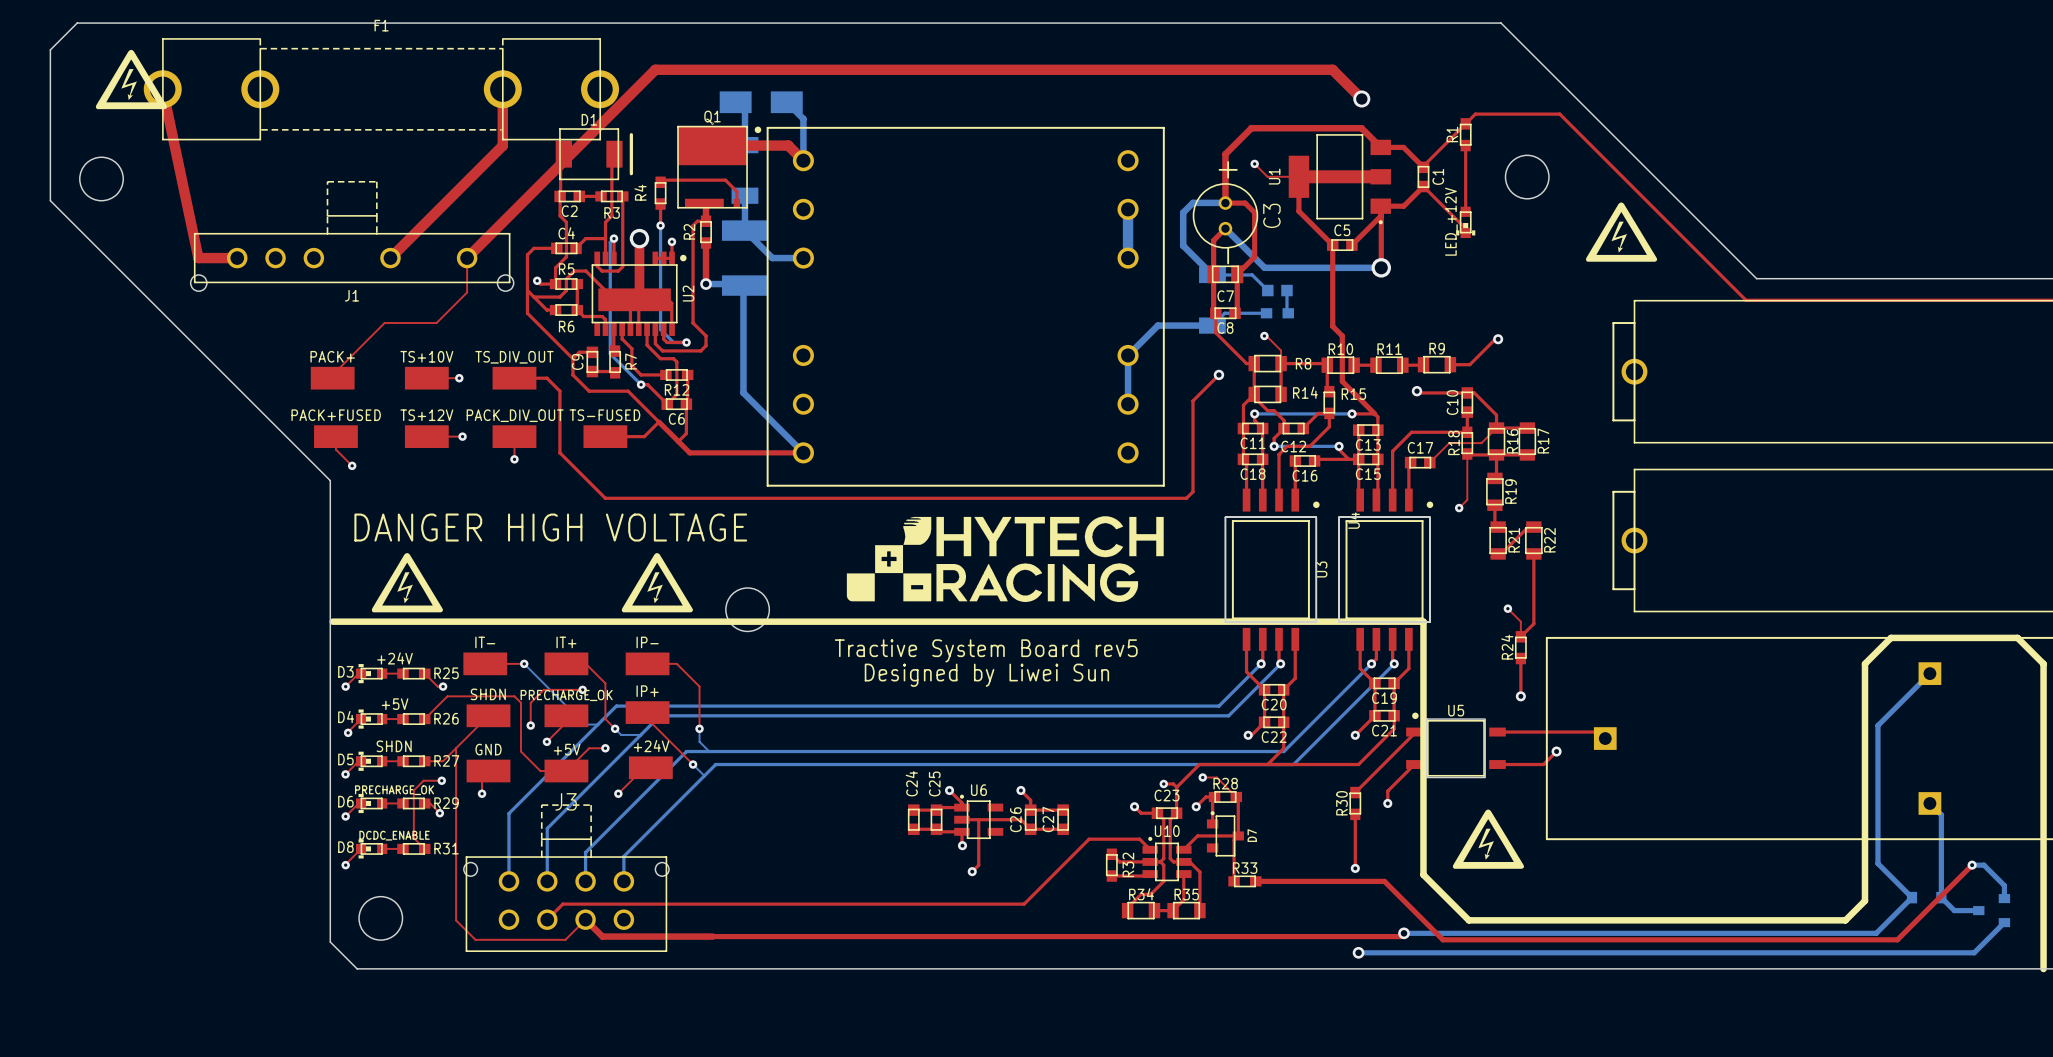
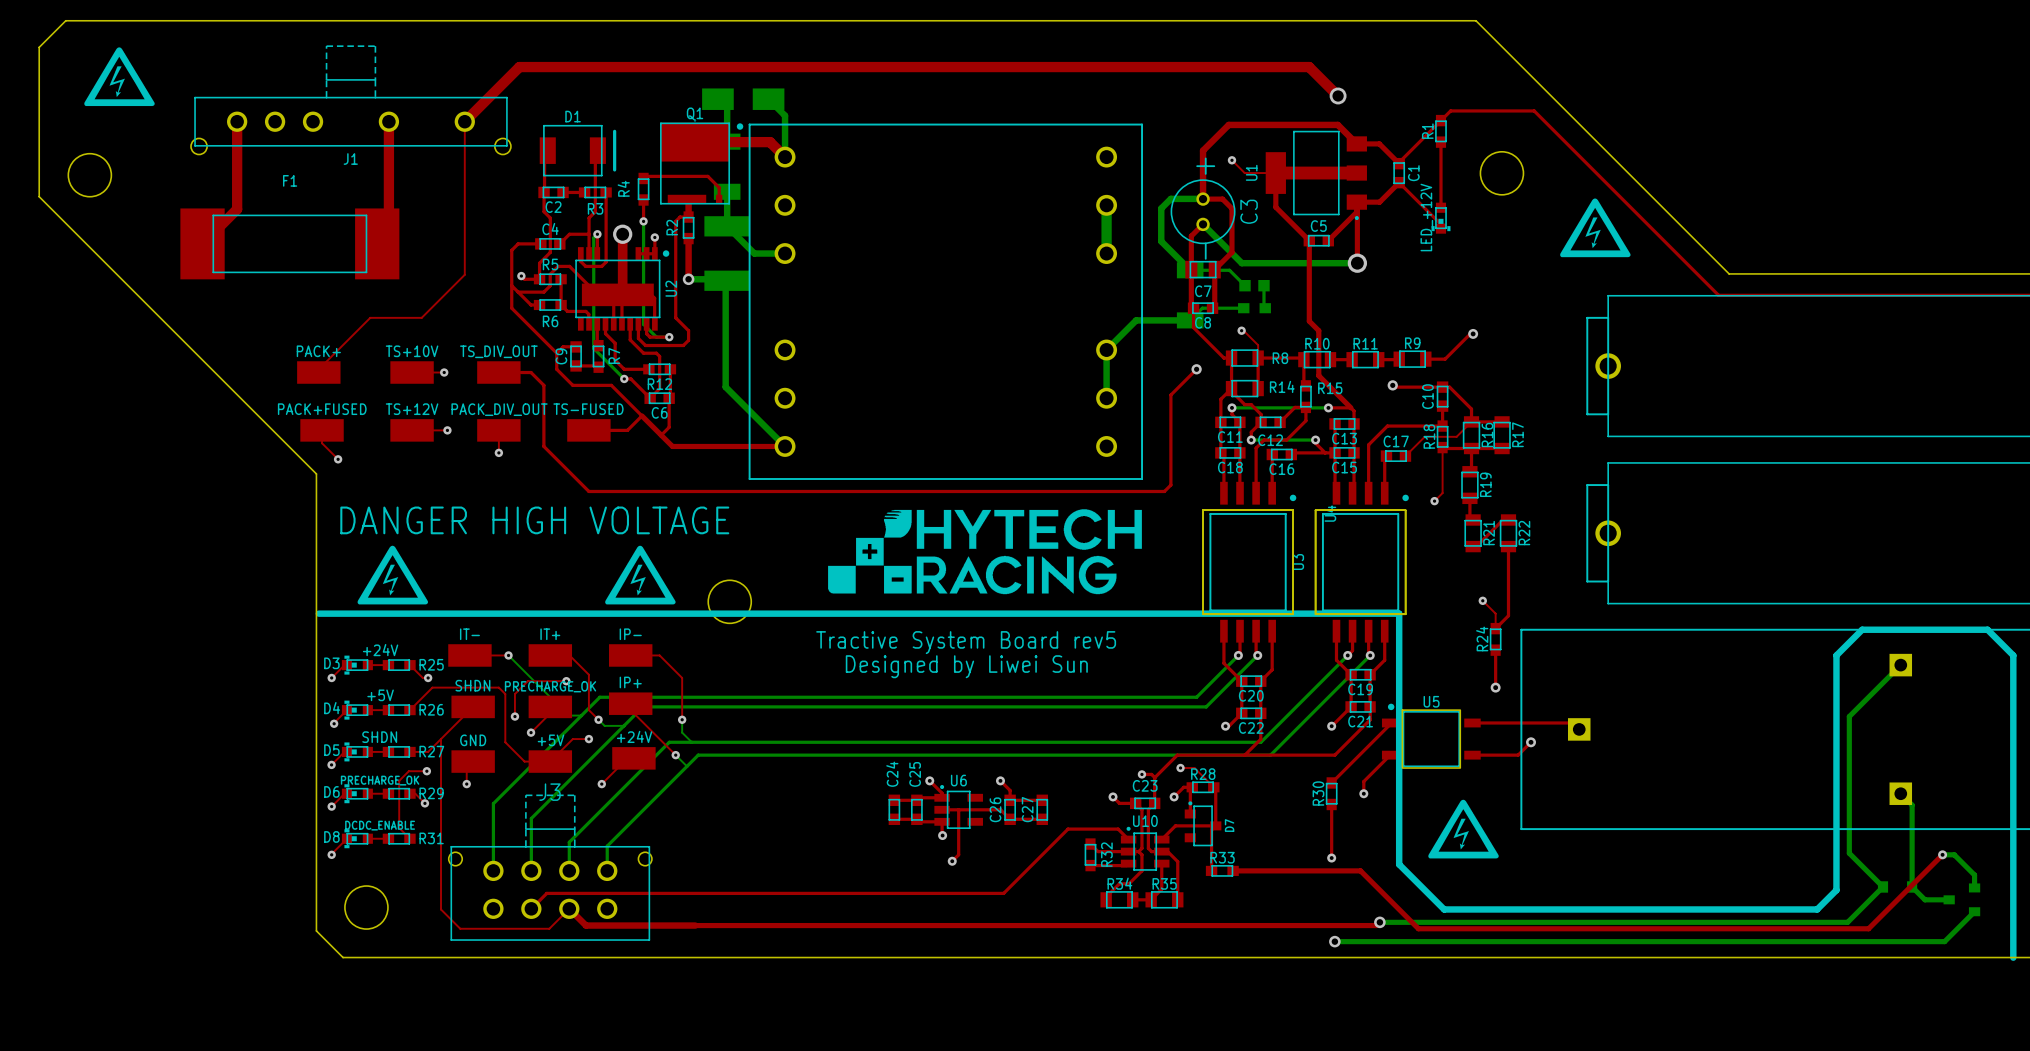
F1 footprint: [143, 38, 620, 141] -> [180, 208, 400, 280]
top track: (655, 69) (467, 258) (467, 292) -> (638, 67) (519, 67) (464, 121) (464, 274) (451, 287)
top track: (162, 89) (198, 258) (237, 258) -> none
top track: (502, 89) (502, 145) (390, 258) -> none
top track: none -> (237, 121) (237, 209) (202, 243)
top track: none -> (388, 121) (388, 232) (377, 243)
J1 position: (352, 236) -> (350, 99)

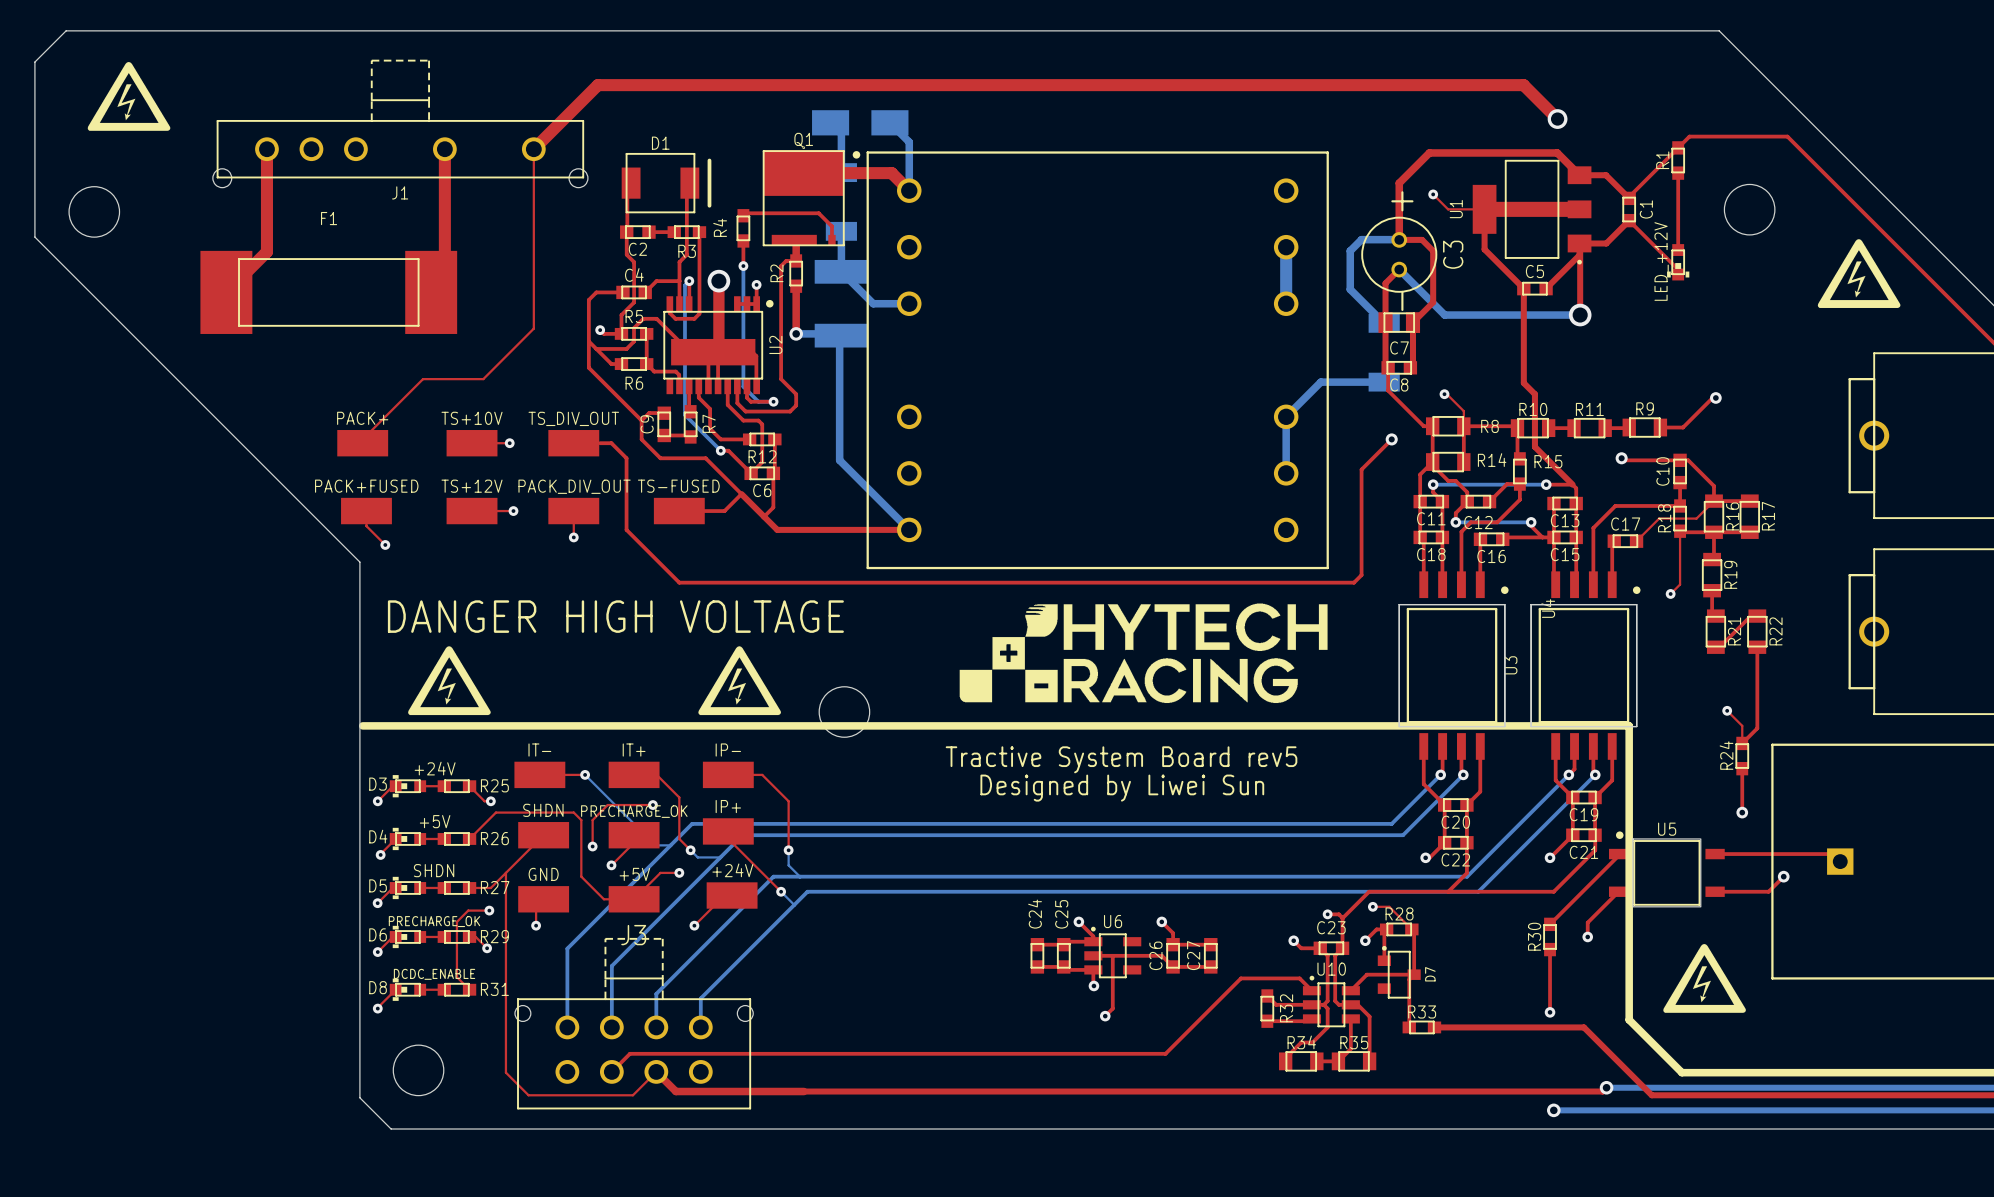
bottom track: (1190, 270) (1229, 270) (1244, 285) -> none
part: (1254, 285) -> none
bottom track: (1263, 285) (1265, 308) -> none
bottom track: (1243, 308) (1202, 308) (1190, 320) -> none
part: (1254, 308) -> none

